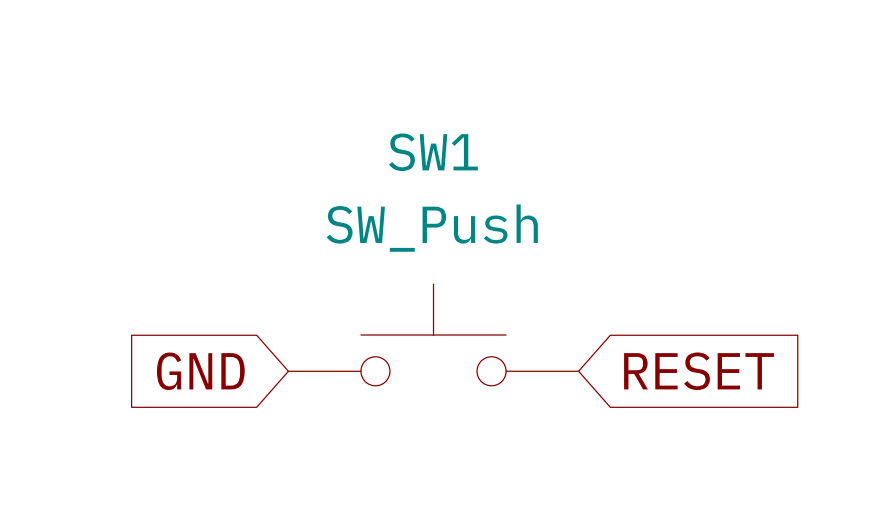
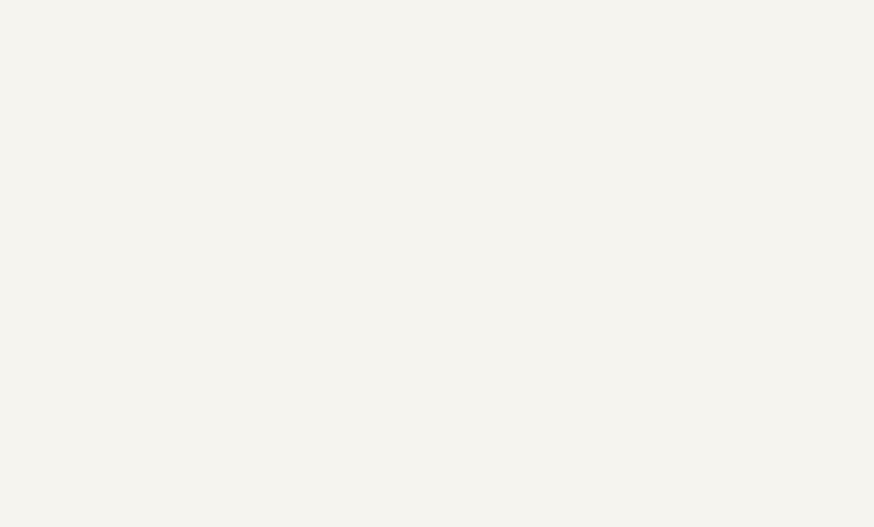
SW1: SW_Push (433, 335) -> none
global label: GND (200, 371) -> none
global label: RESET (699, 371) -> none

